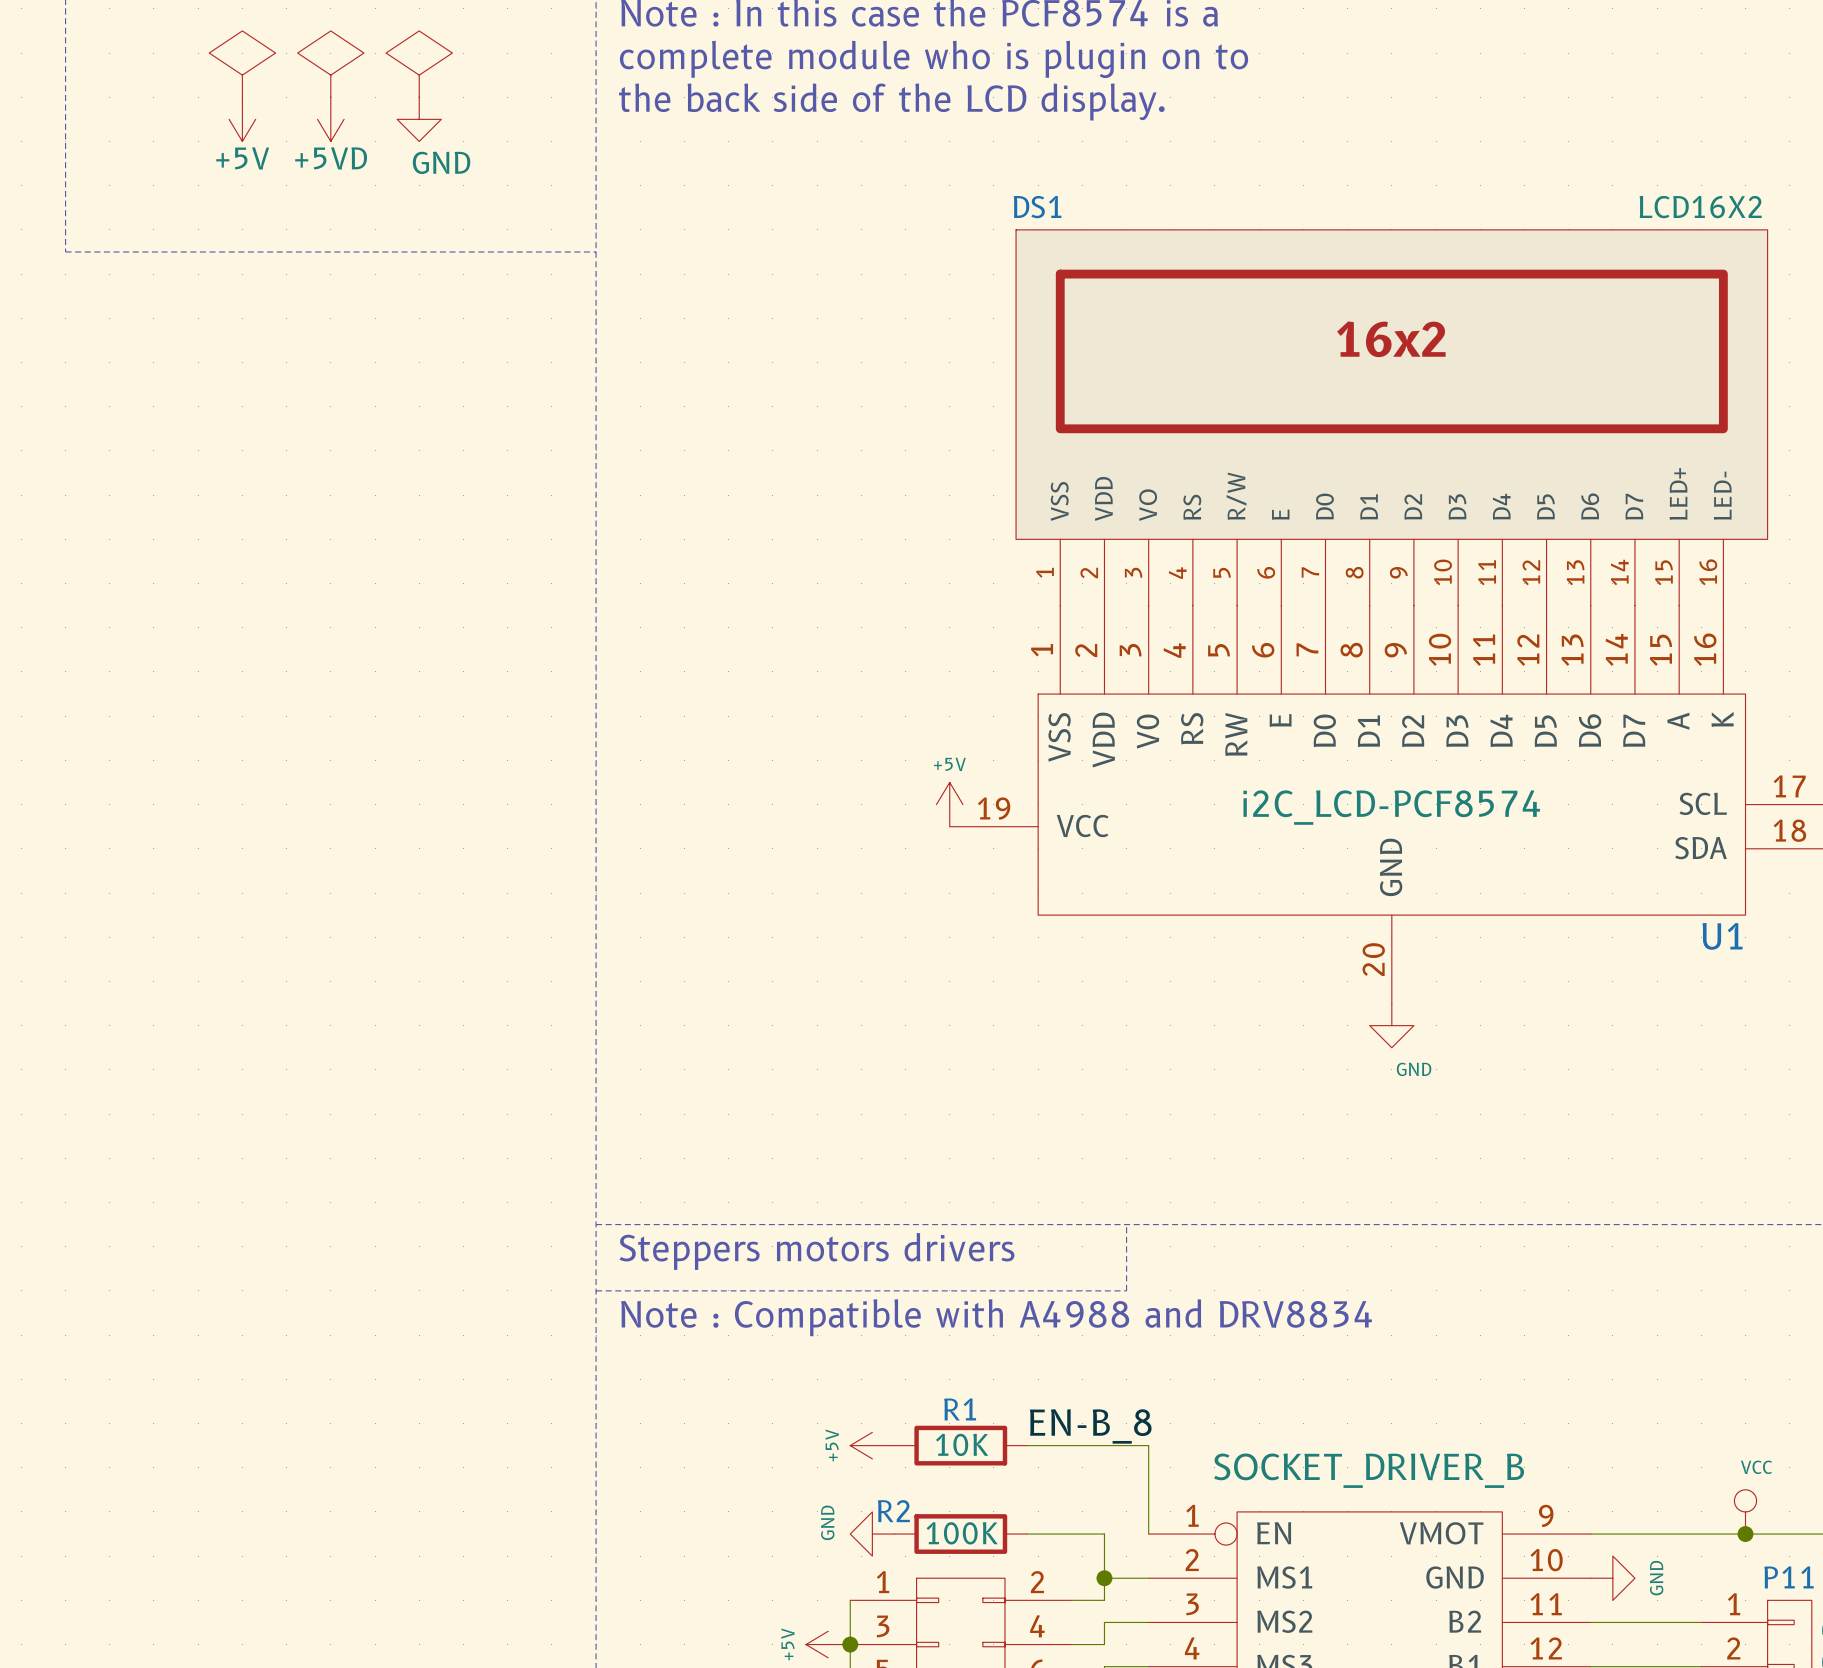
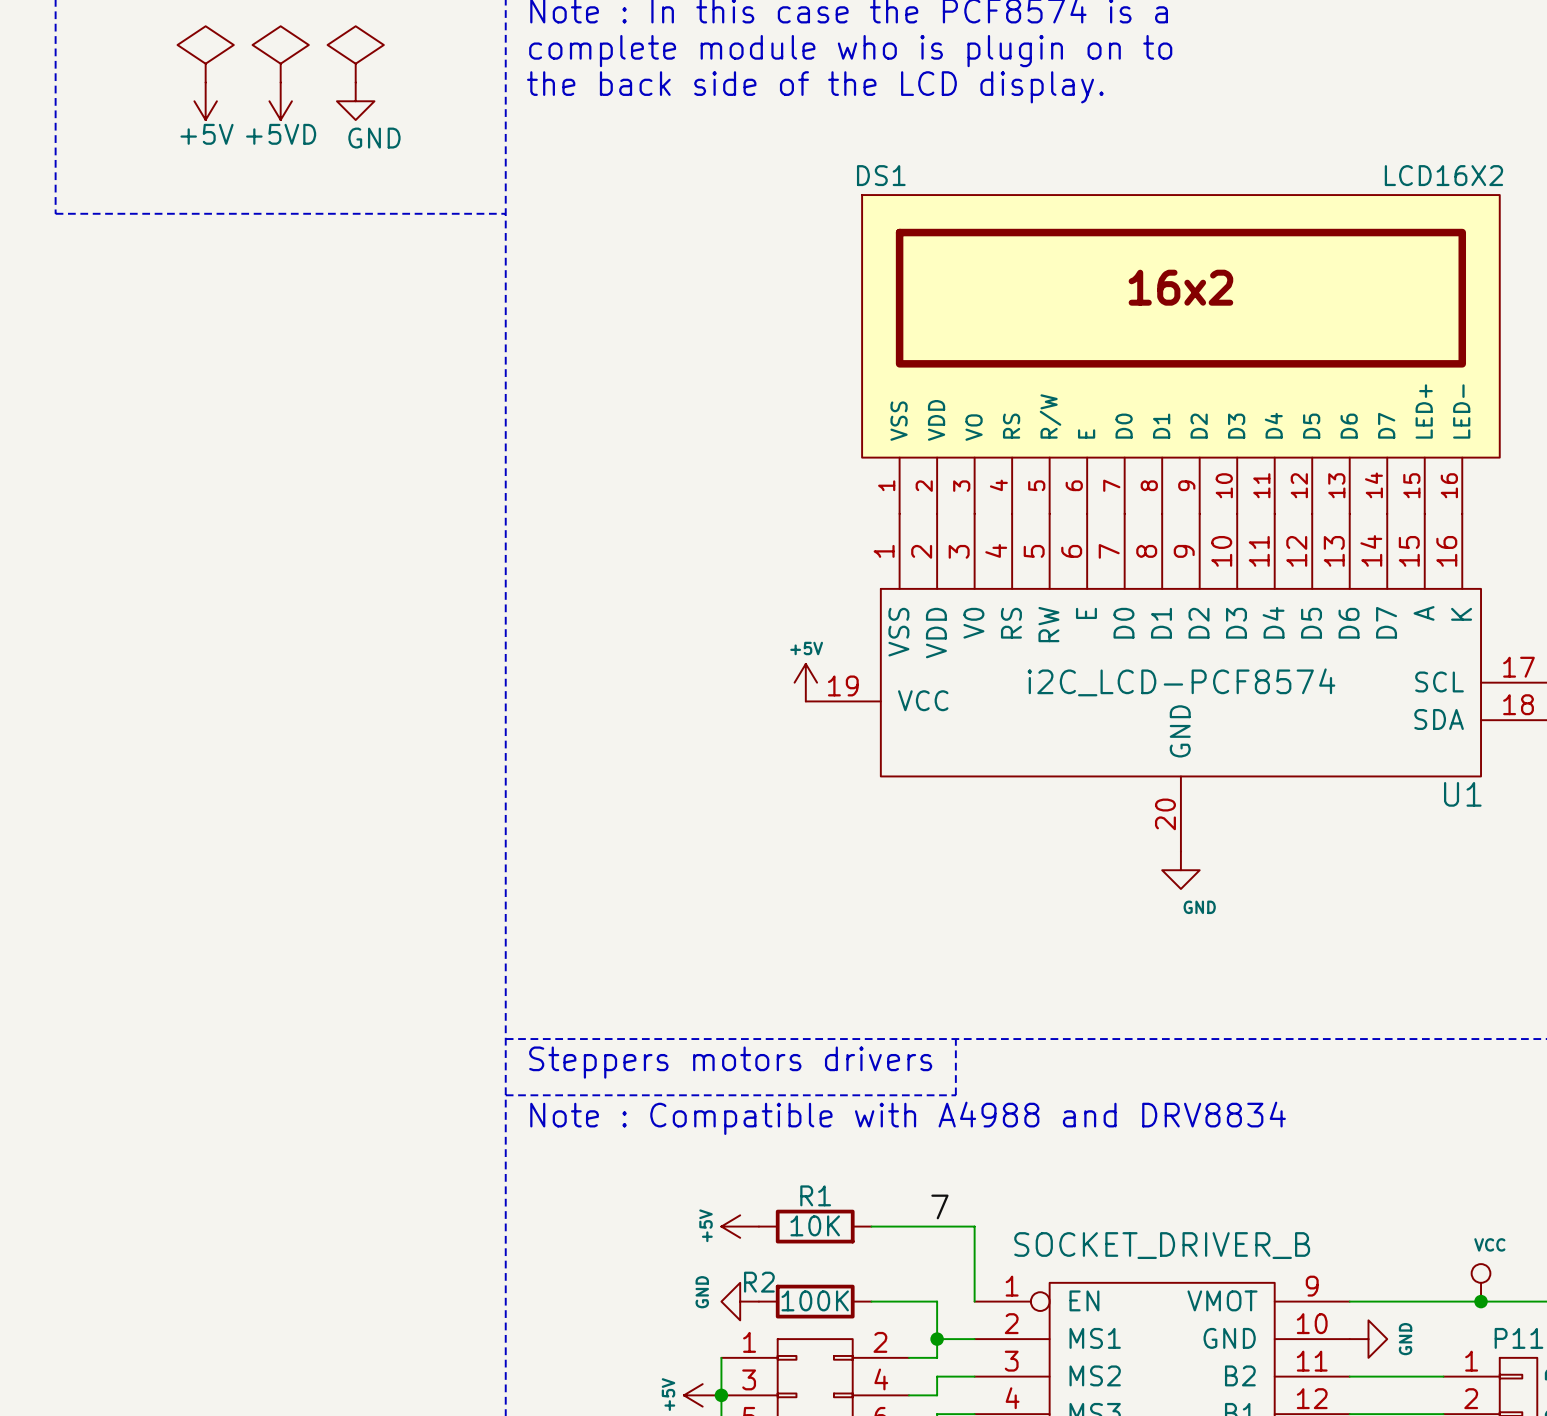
label: none -> 7 (939, 1206)
label: EN-B_8 (1090, 1426) -> none

